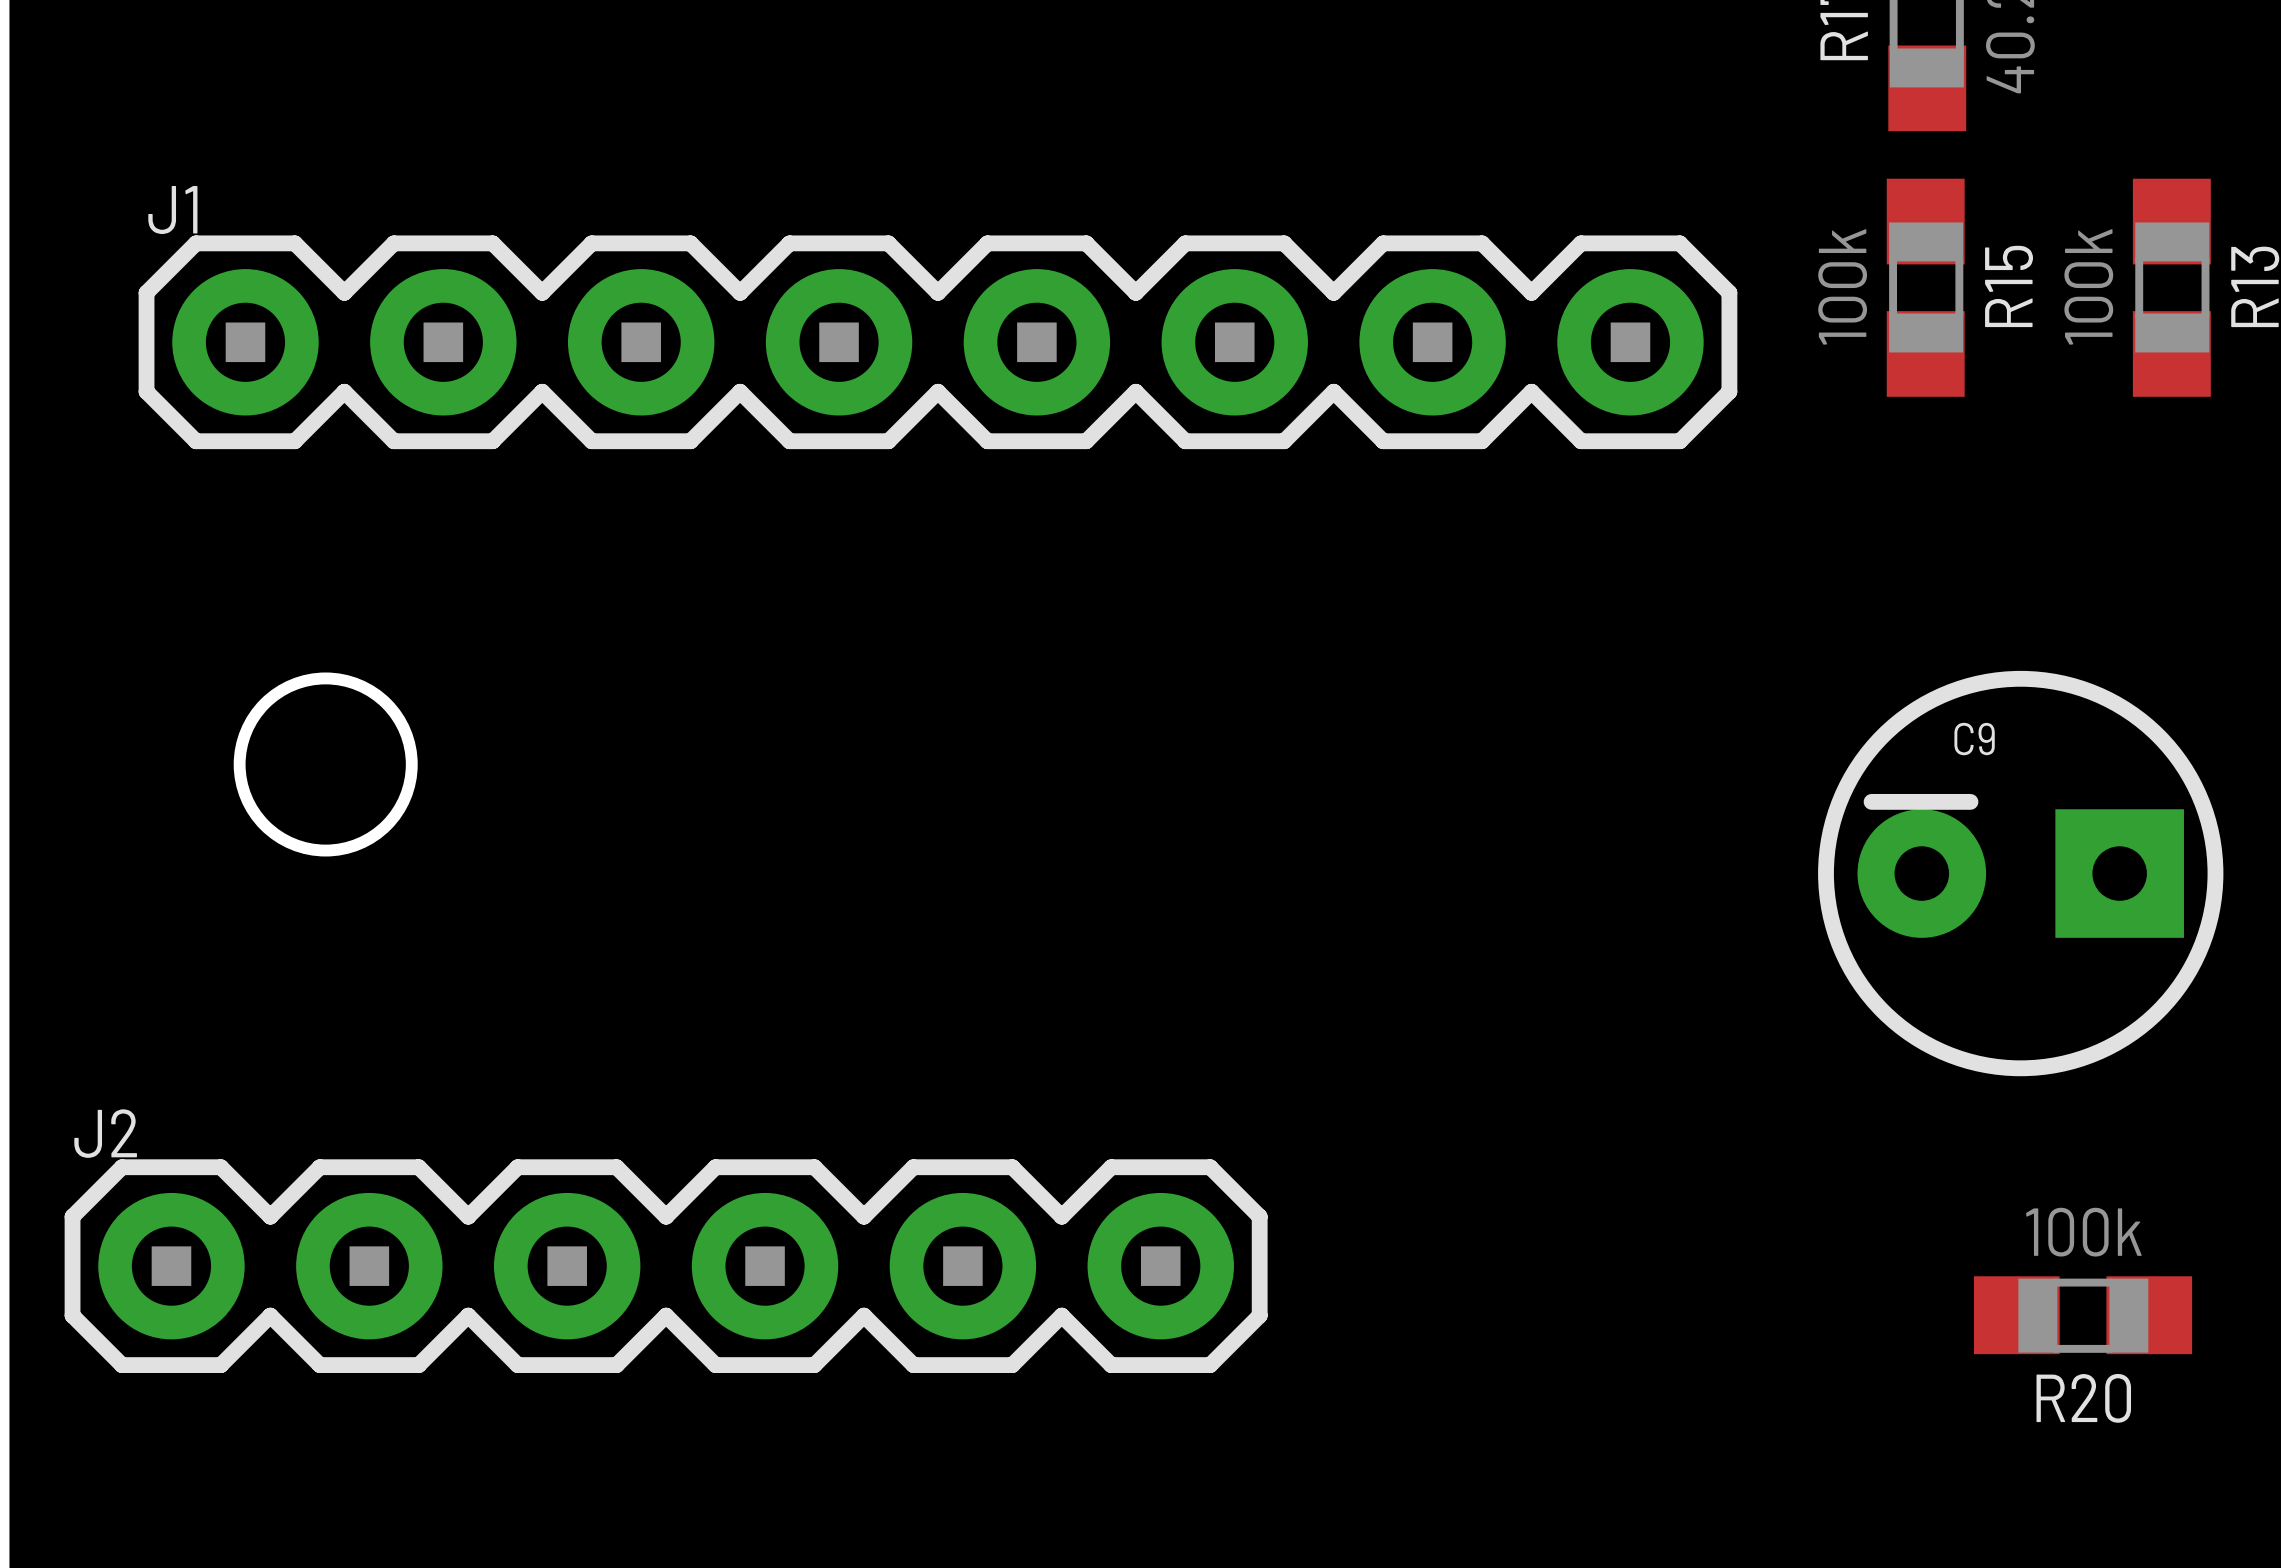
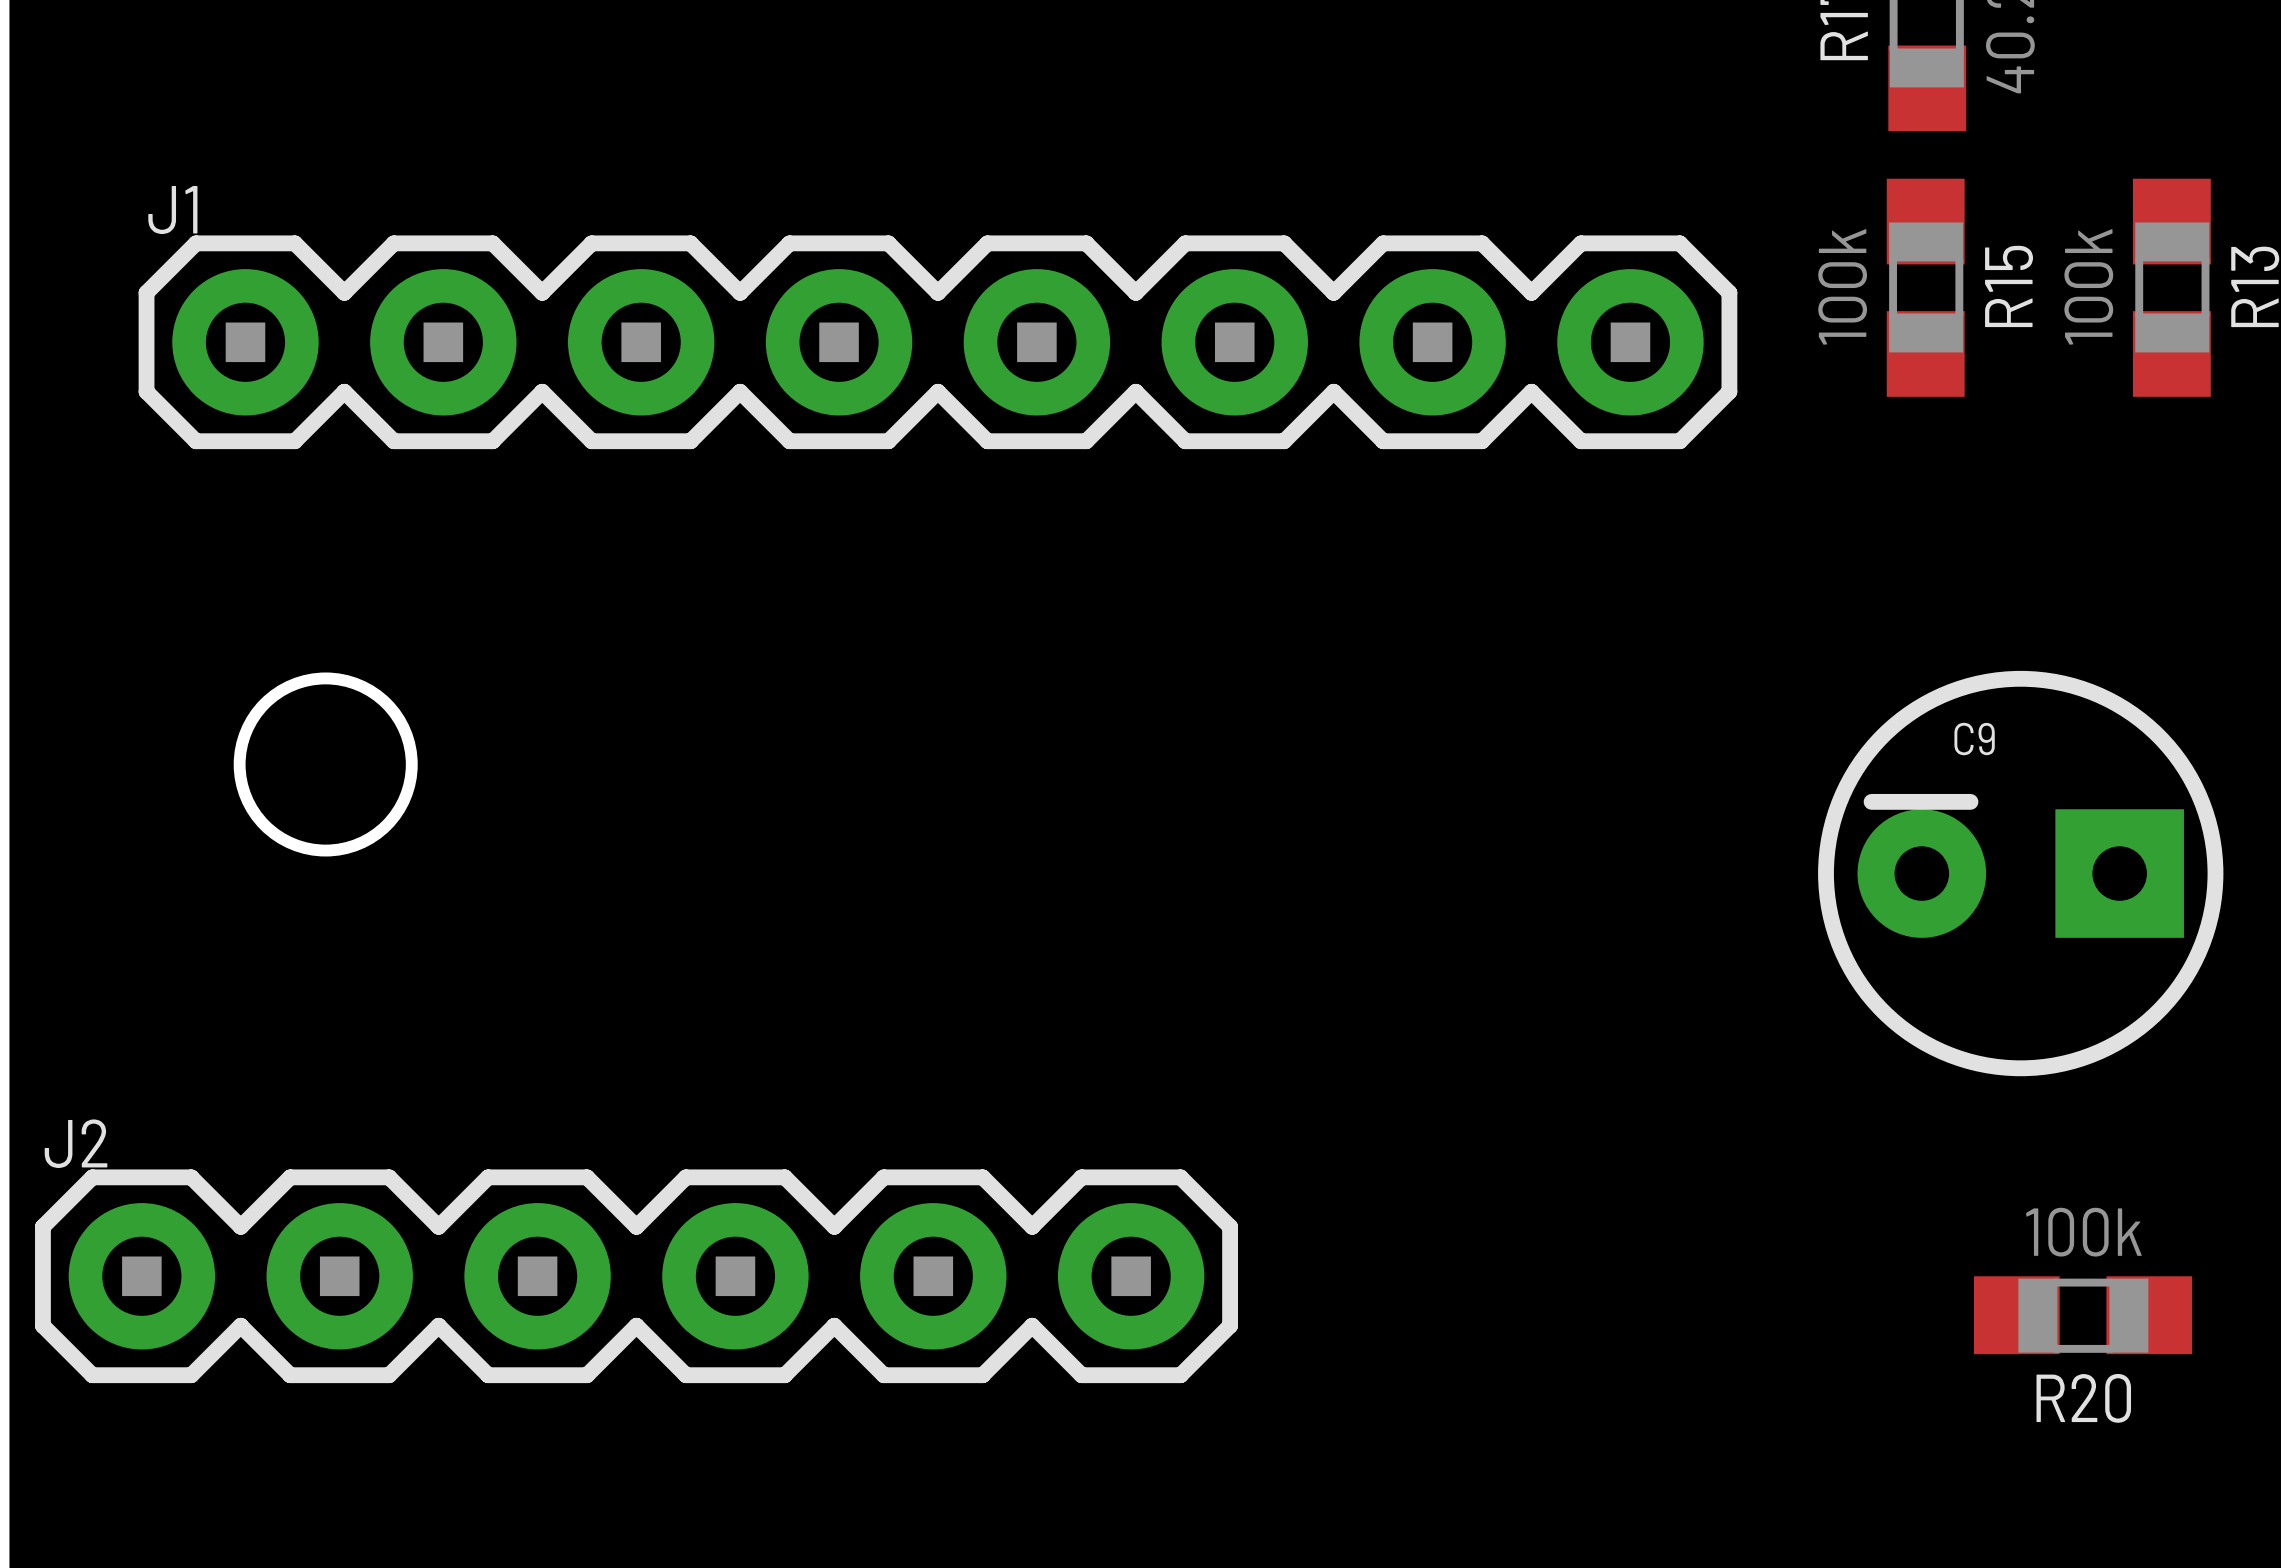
J2 position: (666, 1266) -> (636, 1276)

